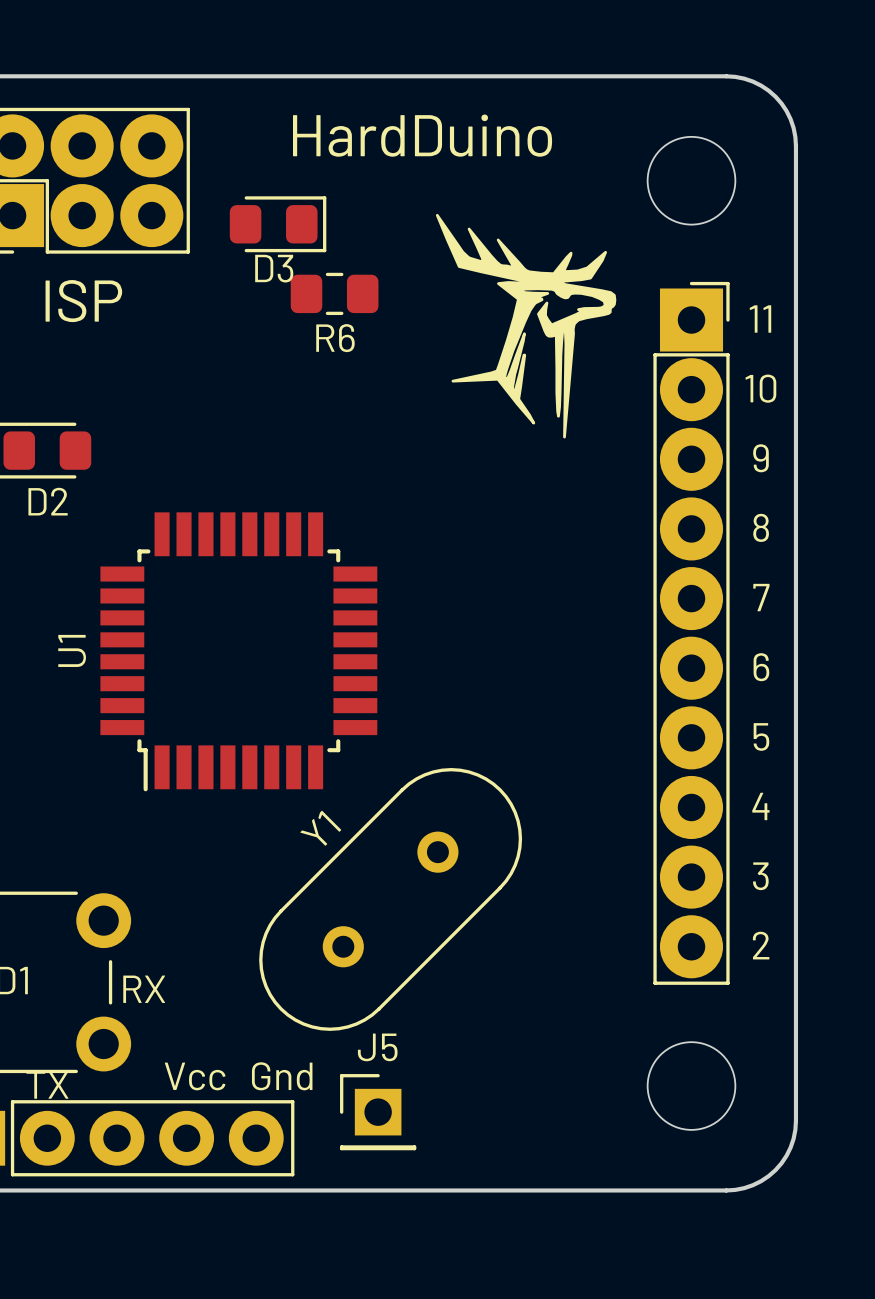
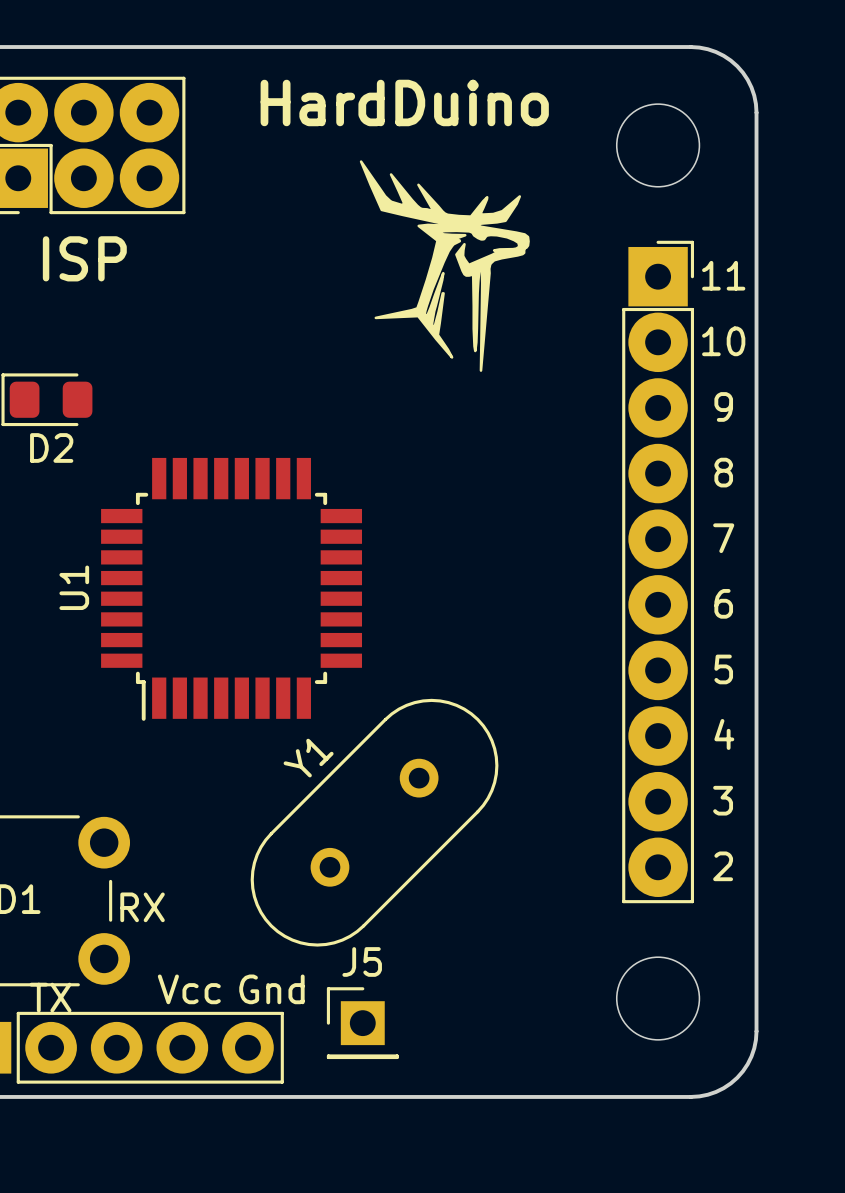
D3: (278, 224) -> none
R6: (334, 293) -> none
drawing position: (526, 326) -> (444, 266)

